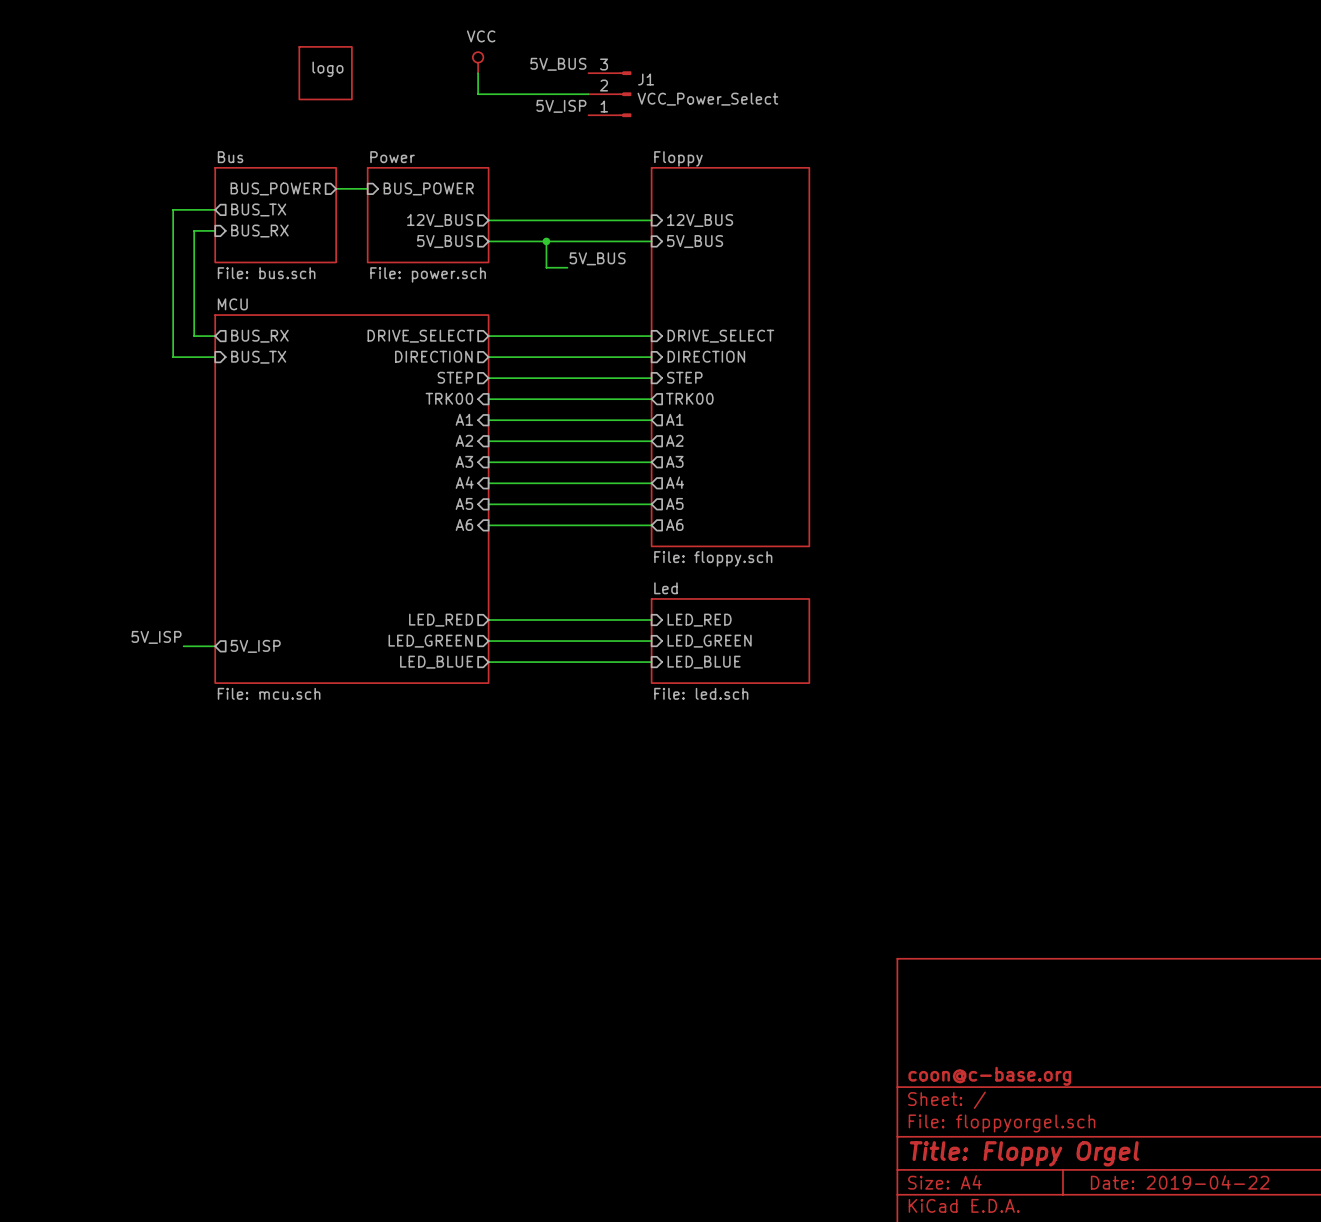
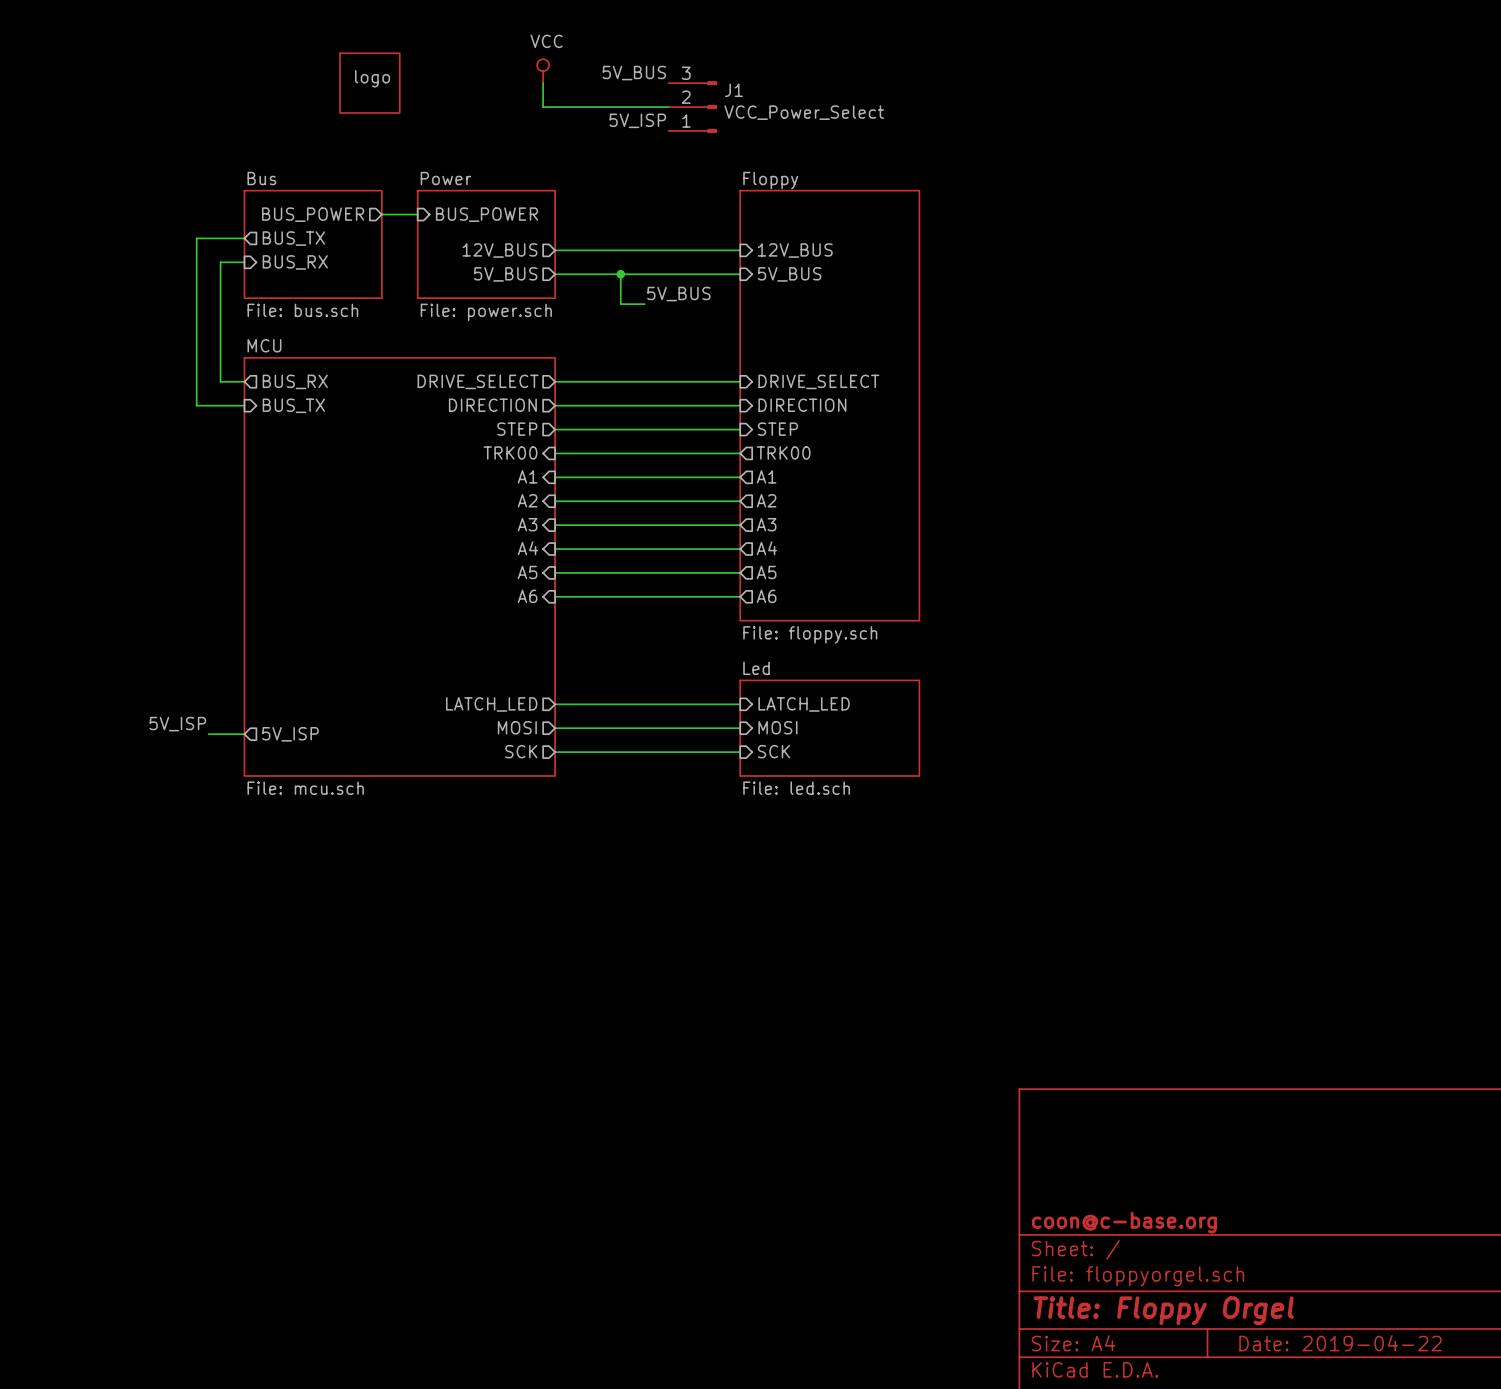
sheet pin: LED_RED (441, 620) -> LATCH_LED (491, 704)
sheet pin: LED_RED (699, 620) -> LATCH_LED (804, 704)
sheet pin: LED_GREEN (430, 641) -> MOSI (517, 727)
sheet pin: LED_GREEN (709, 641) -> MOSI (777, 727)
sheet pin: LED_BLUE (436, 662) -> SCK (521, 751)
sheet pin: LED_BLUE (704, 662) -> SCK (773, 751)

